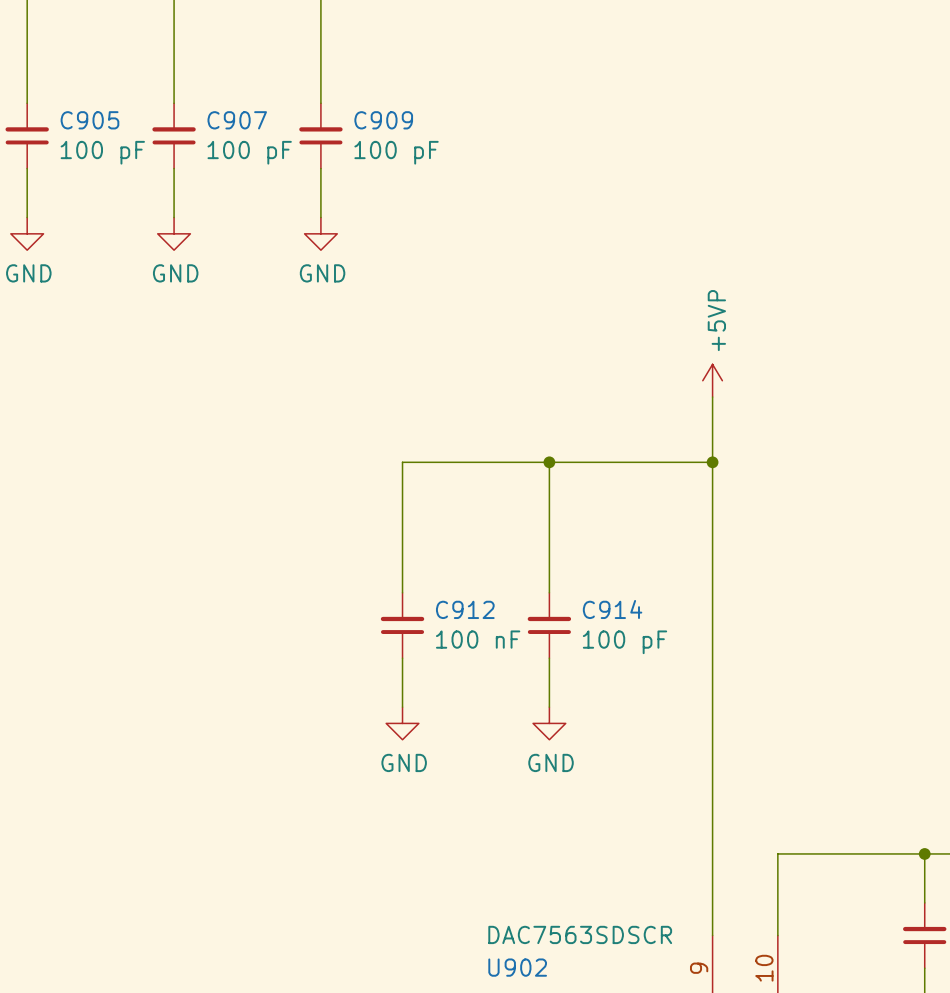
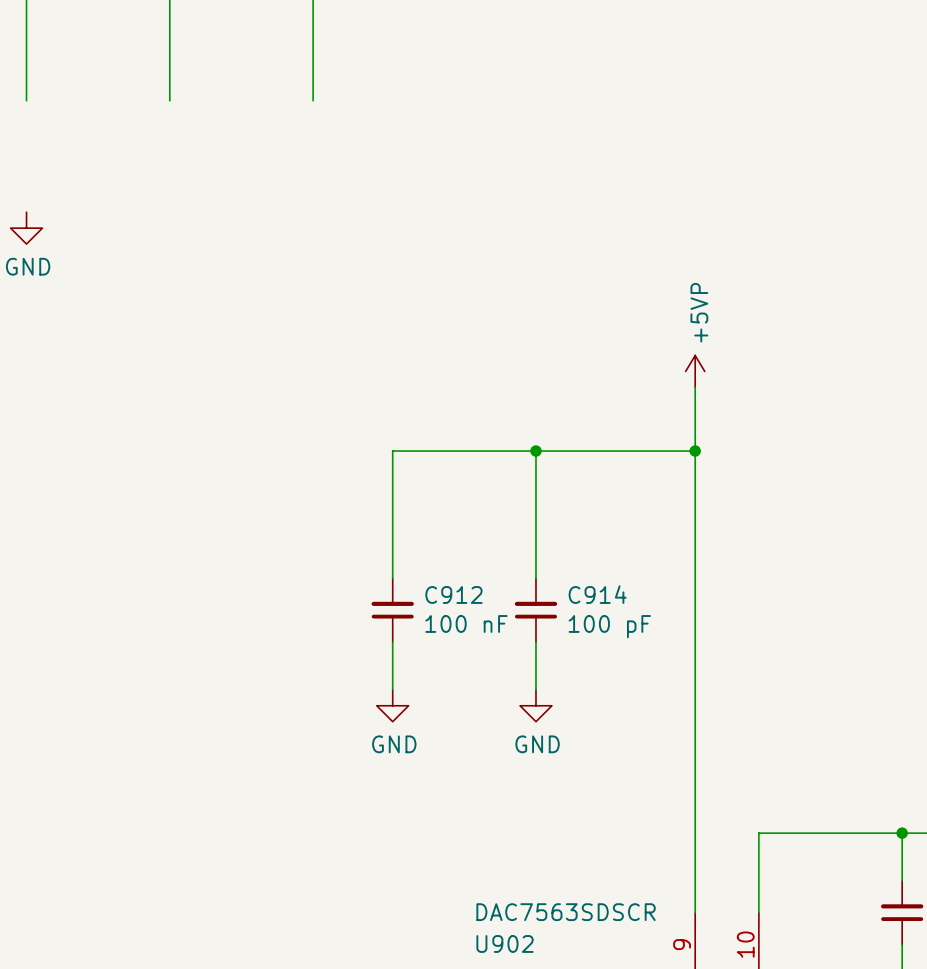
C905: 100 pF (27, 135) -> none
C907: 100 pF (174, 135) -> none
C909: 100 pF (320, 135) -> none
wire: (27, 168) (27, 217) -> none
wire: (174, 168) (174, 217) -> none
wire: (320, 168) (320, 217) -> none
power symbol: GND (174, 233) -> none
power symbol: GND (320, 233) -> none

